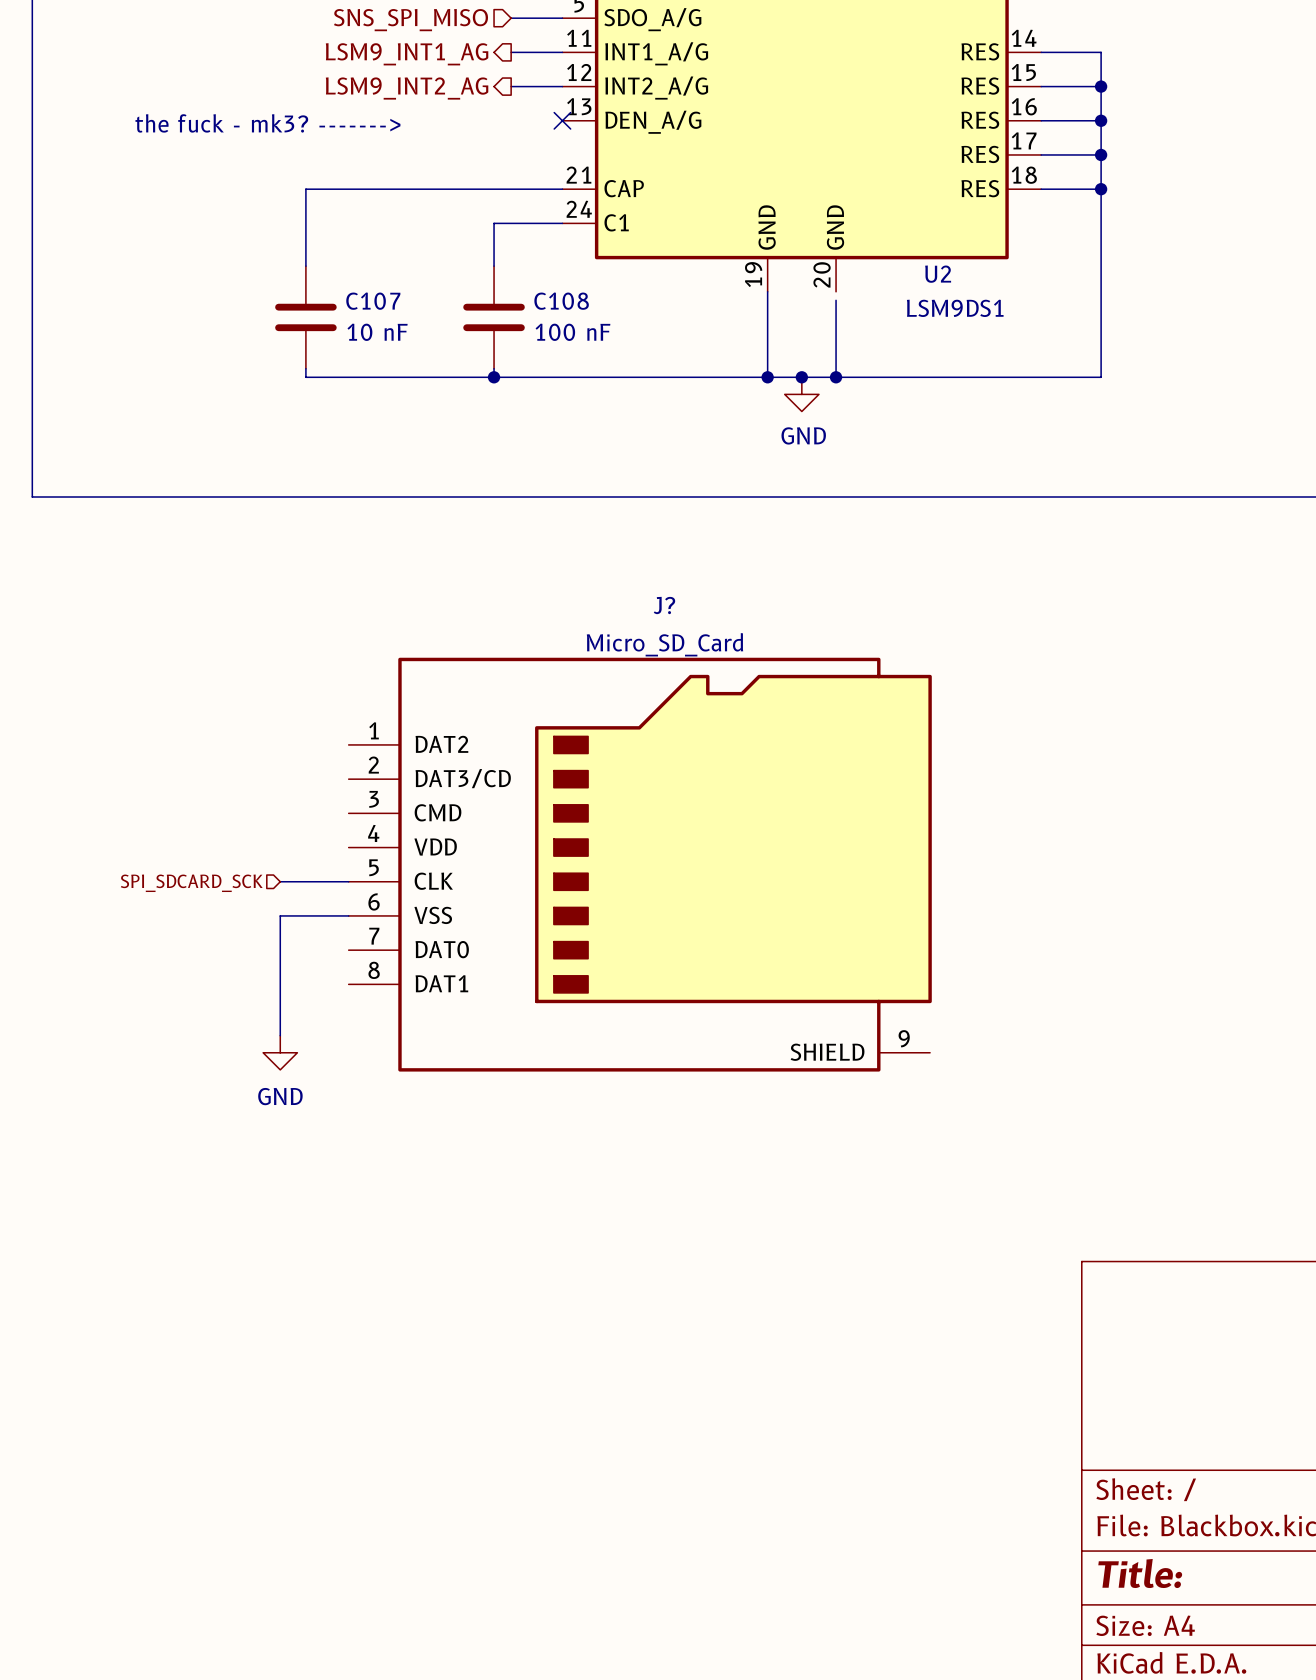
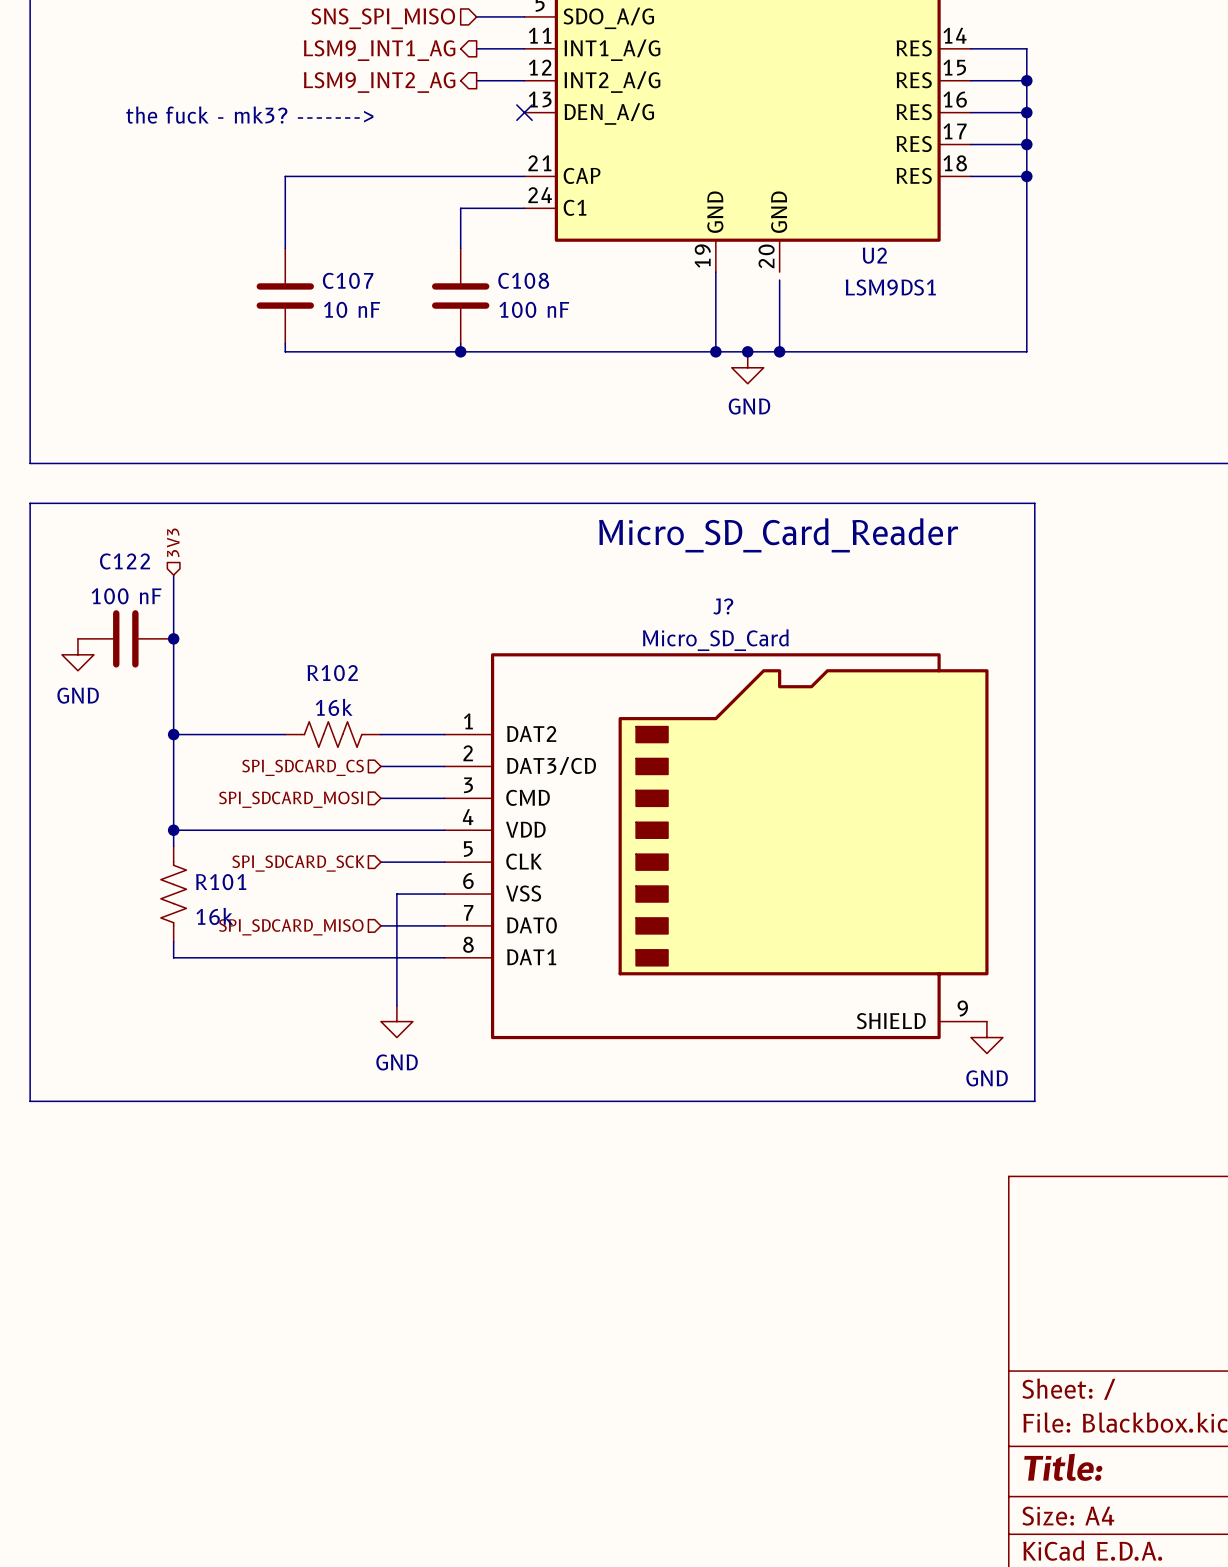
line: none -> (30, 503) (1034, 503) (1034, 1101) (30, 1101) (30, 503)
text: none -> Micro_SD_Card_Reader (778, 535)
hierarchical label: none -> 3V3 (173, 542)
J? name position: J? (664, 605) -> J? (723, 606)
wire: none -> (173, 575) (173, 846)
J? value position: Micro_SD_Card (664, 644) -> Micro_SD_Card (715, 640)
C122: none -> 100 nF (125, 638)
junction: none -> (173, 638)
power symbol: none -> GND (77, 654)
wire: none -> (173, 734) (285, 734)
junction: none -> (173, 734)
R102: none -> 16k (333, 734)
wire: none -> (380, 734) (444, 734)
wire: none -> (380, 766) (444, 766)
hierarchical label: none -> SPI_SDCARD_CS (303, 767)
hierarchical label: none -> SPI_SDCARD_MOSI (291, 799)
J? position: (640, 864) -> (716, 846)
wire: (280, 881) (348, 881) -> (380, 798) (444, 798)
hierarchical label position: SPI_SDCARD_SCK (191, 883) -> SPI_SDCARD_SCK (298, 863)
wire: none -> (173, 830) (444, 830)
junction: none -> (173, 830)
wire: (348, 915) (280, 915) (280, 1035) -> none
wire: none -> (380, 862) (444, 862)
R101: none -> 16k (173, 894)
wire: none -> (444, 894) (396, 894) (396, 1005)
wire: none -> (380, 925) (444, 925)
hierarchical label: none -> SPI_SDCARD_MISO (291, 927)
wire: none -> (173, 941) (173, 957) (444, 957)
power symbol position: GND (280, 1052) -> GND (396, 1021)
power symbol: none -> GND (986, 1037)

